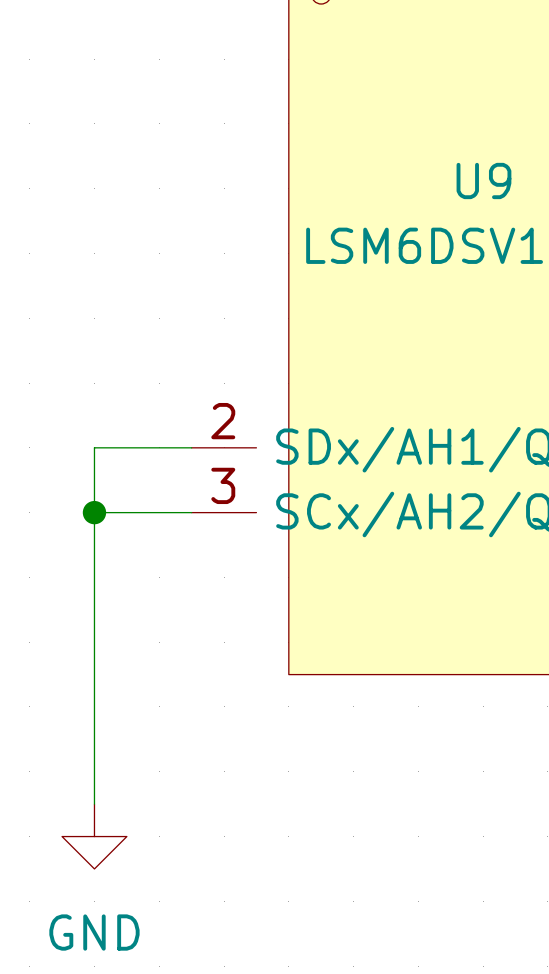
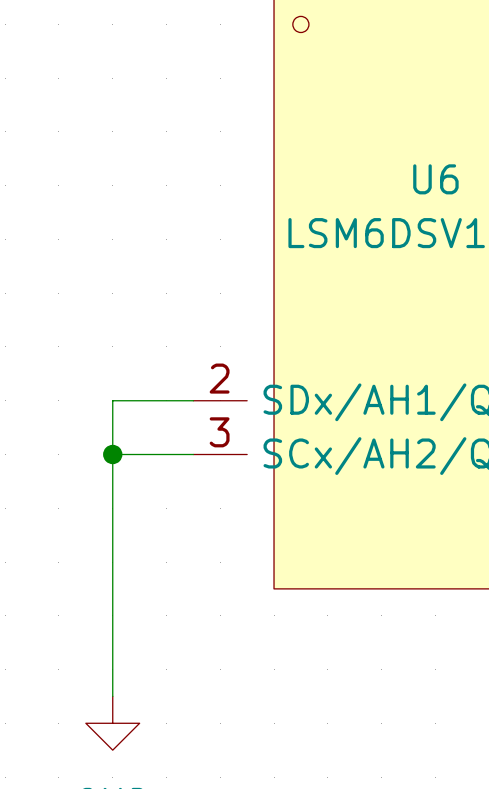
U9 name: U9 (483, 180) -> U6 (435, 179)

